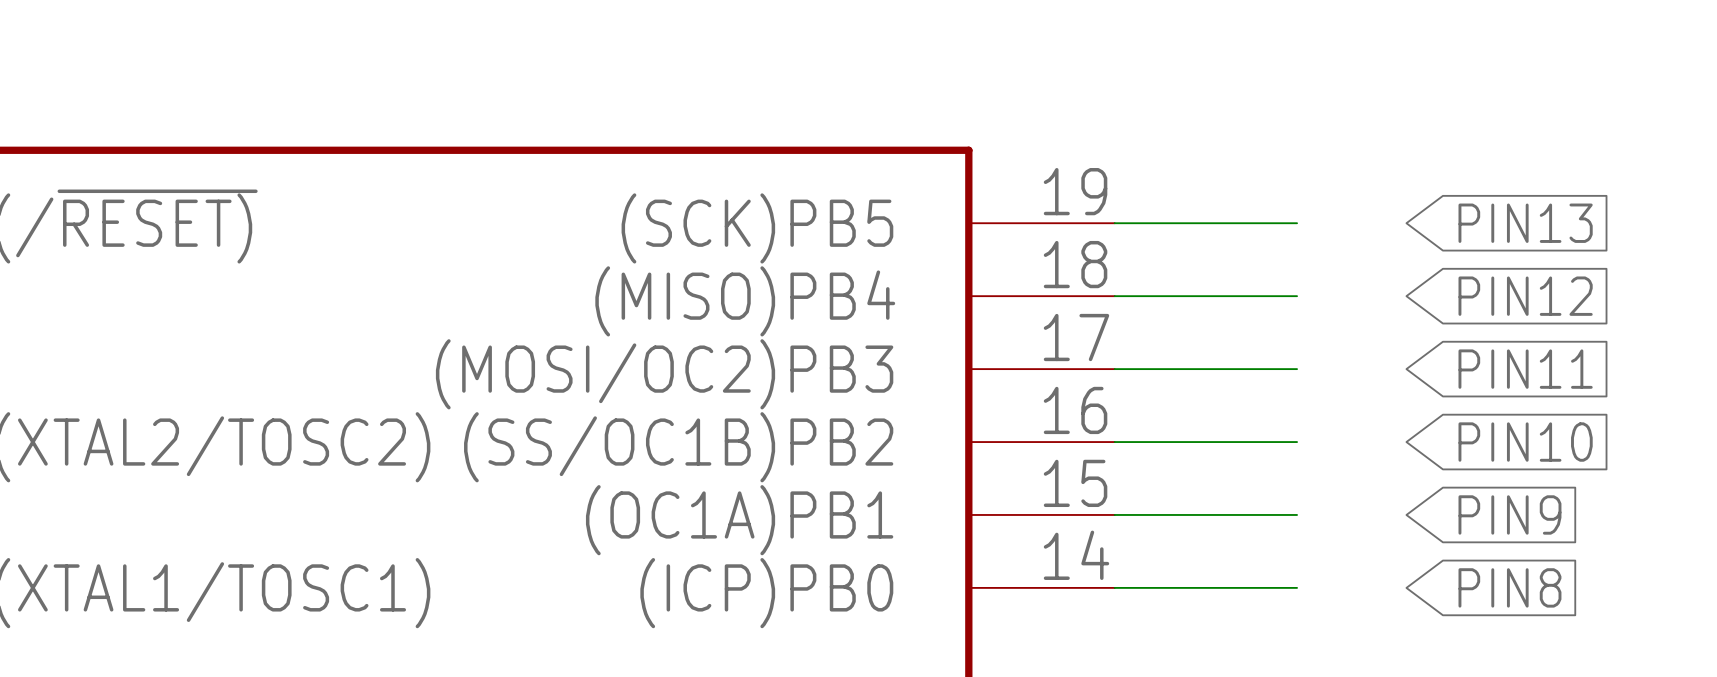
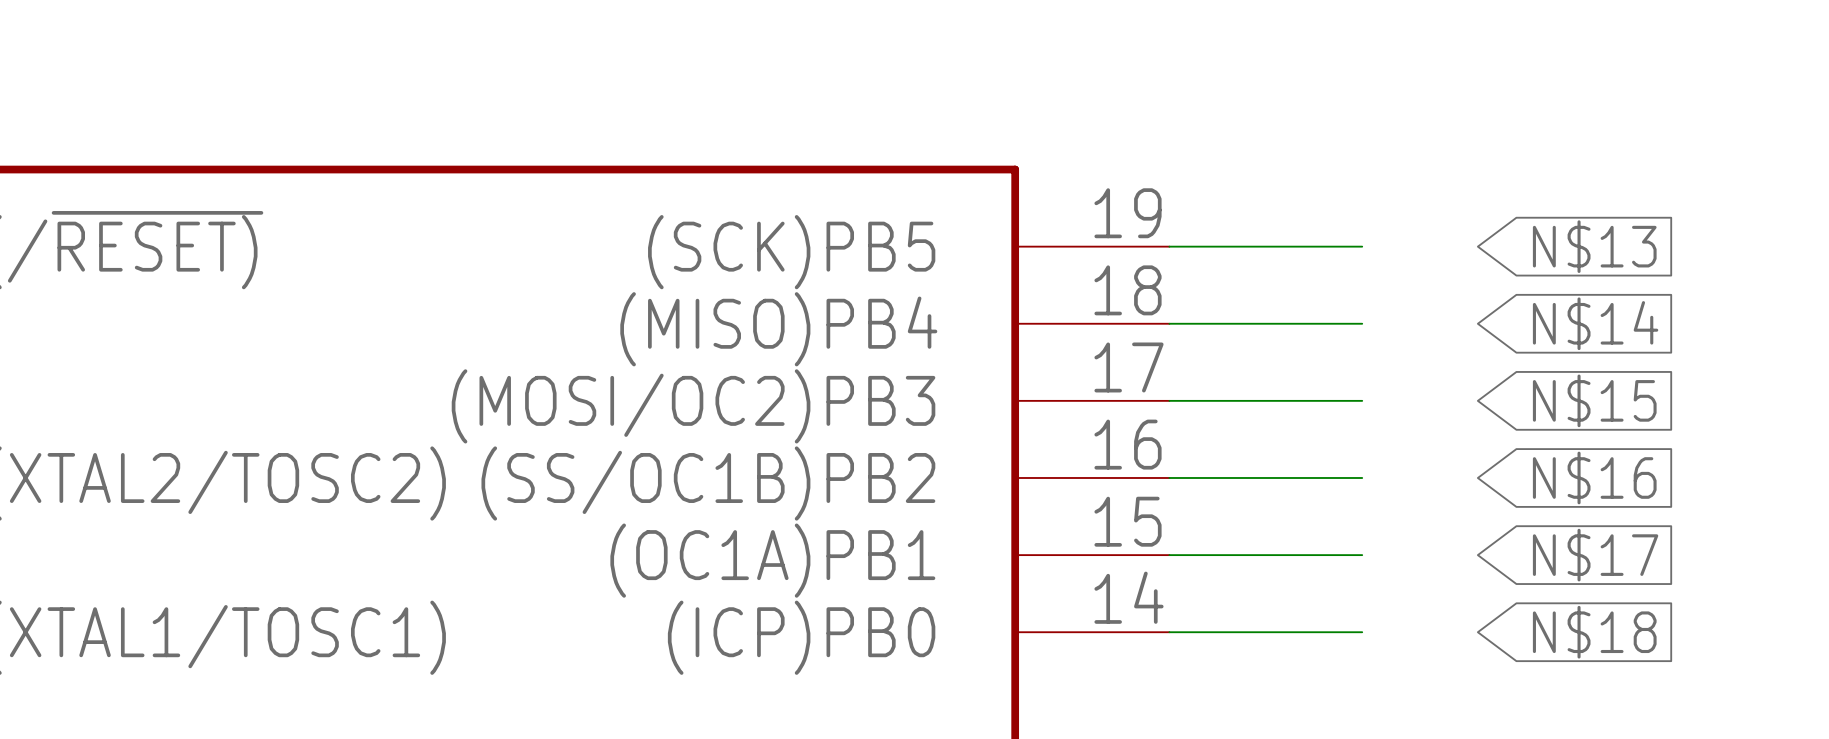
global label: PIN13 (1525, 223) -> N$13 (1594, 246)
global label: PIN12 (1525, 296) -> N$14 (1595, 323)
global label: PIN11 (1525, 369) -> N$15 (1594, 400)
global label: PIN10 (1525, 442) -> N$16 (1594, 477)
global label: PIN9 (1509, 514) -> N$17 (1595, 555)
global label: PIN8 (1509, 587) -> N$18 (1594, 632)

